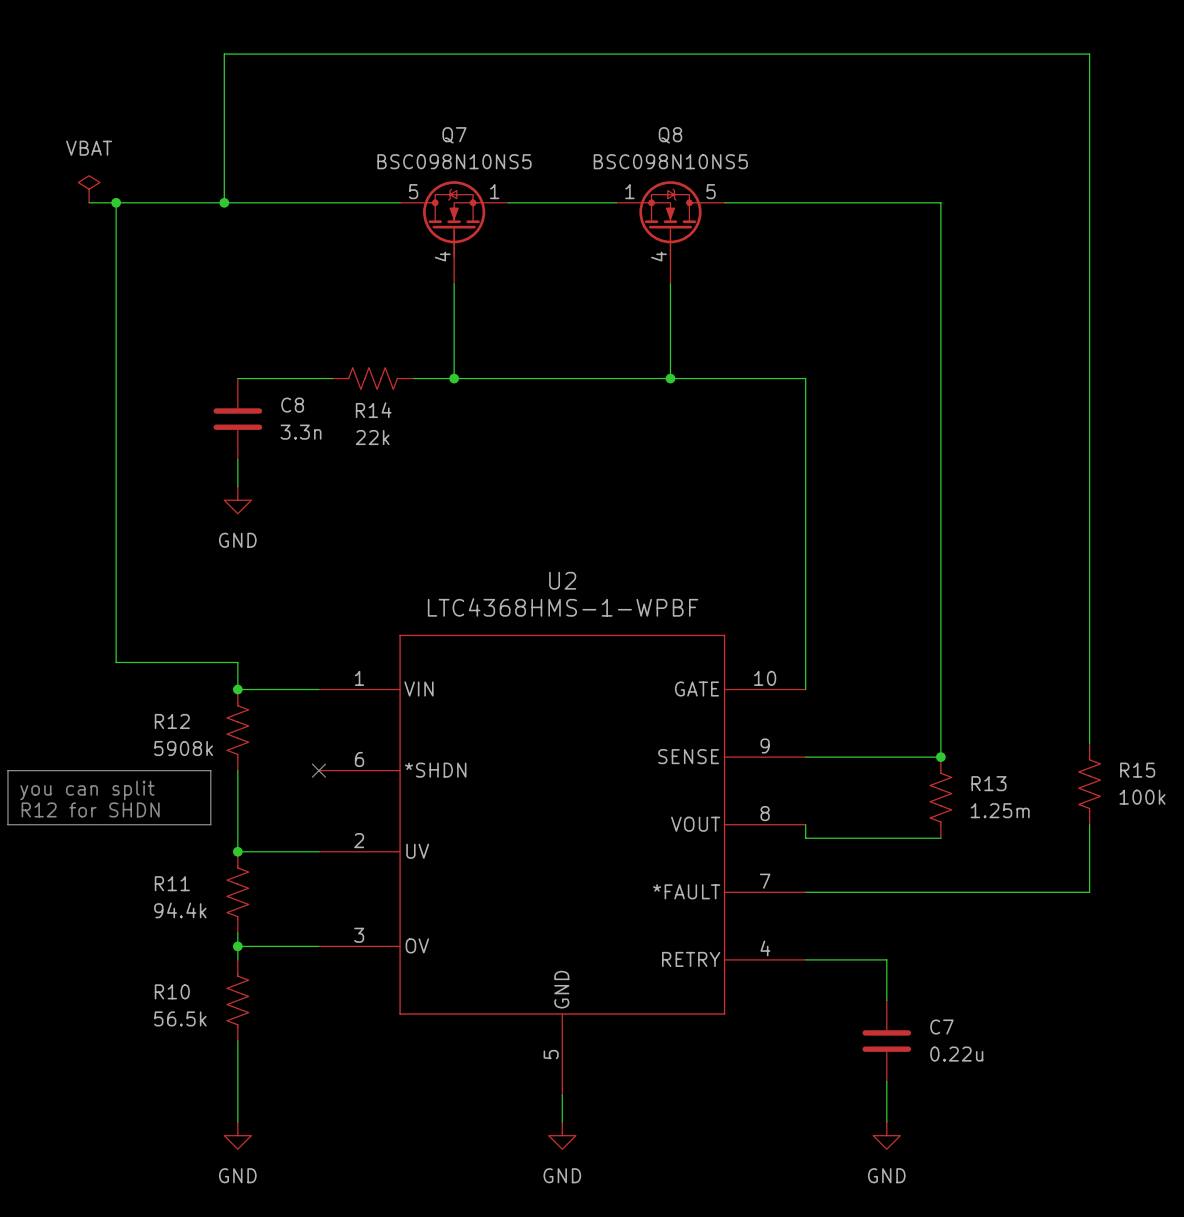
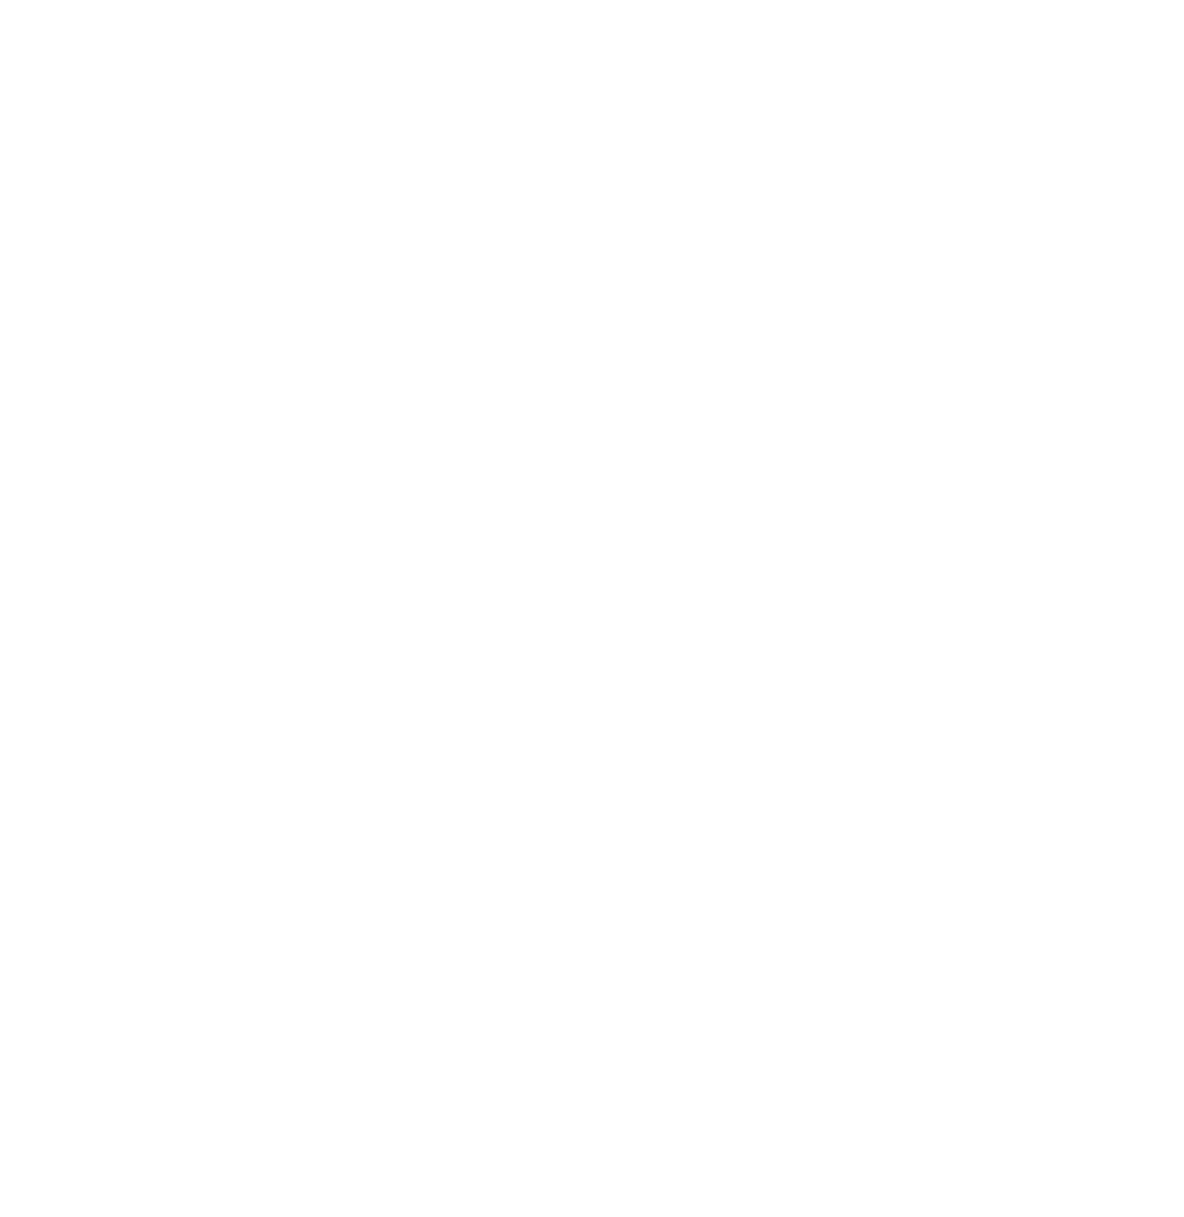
power symbol: VBAT (89, 189) -> none
wire: (89, 202) (400, 202) -> none
wire: (116, 202) (116, 662) (237, 662) (237, 689) (318, 689) -> none
junction: (116, 202) -> none
wire: (224, 202) (224, 54) (1089, 54) (1089, 743) -> none
junction: (224, 202) -> none
wire: (508, 202) (616, 202) -> none
wire: (724, 202) (940, 202) (940, 757) (805, 757) -> none
Q7: BSC098N10NS5 (454, 232) -> none
Q8: BSC098N10NS5 (670, 232) -> none
wire: (454, 283) (454, 378) -> none
wire: (670, 283) (670, 378) -> none
wire: (237, 378) (332, 378) -> none
R14: 22k (373, 378) -> none
wire: (413, 378) (805, 378) (805, 689) -> none
junction: (454, 378) -> none
junction: (670, 378) -> none
C8: 3.3n (237, 419) -> none
wire: (237, 459) (237, 486) -> none
power symbol: GND (237, 500) -> none
junction: (237, 689) -> none
R12: 5908k (237, 730) -> none
junction: (940, 757) -> none
line: (7, 770) (210, 770) (210, 824) (7, 824) (7, 770) -> none
wire: (237, 770) (237, 851) (318, 851) -> none
no-connect mark: (318, 770) -> none
R15: 100k (1089, 784) -> none
text: you can split (87, 790) -> none
R13: 1.25m (940, 797) -> none
text: R12 for SHDN (90, 809) -> none
wire: (805, 824) (805, 838) (940, 838) -> none
wire: (1089, 824) (1089, 892) (805, 892) -> none
junction: (237, 851) -> none
U2: LTC4368HMS-1-WPBF (562, 864) -> none
R11: 94.4k (237, 892) -> none
wire: (237, 932) (237, 959) -> none
wire: (237, 946) (318, 946) -> none
junction: (237, 946) -> none
wire: (805, 959) (886, 959) (886, 1000) -> none
R10: 56.5k (237, 1000) -> none
wire: (237, 1041) (237, 1122) -> none
C7: 0.22u (886, 1041) -> none
wire: (886, 1081) (886, 1122) -> none
wire: (562, 1095) (562, 1122) -> none
power symbol: GND (237, 1135) -> none
power symbol: GND (562, 1135) -> none
power symbol: GND (886, 1135) -> none

